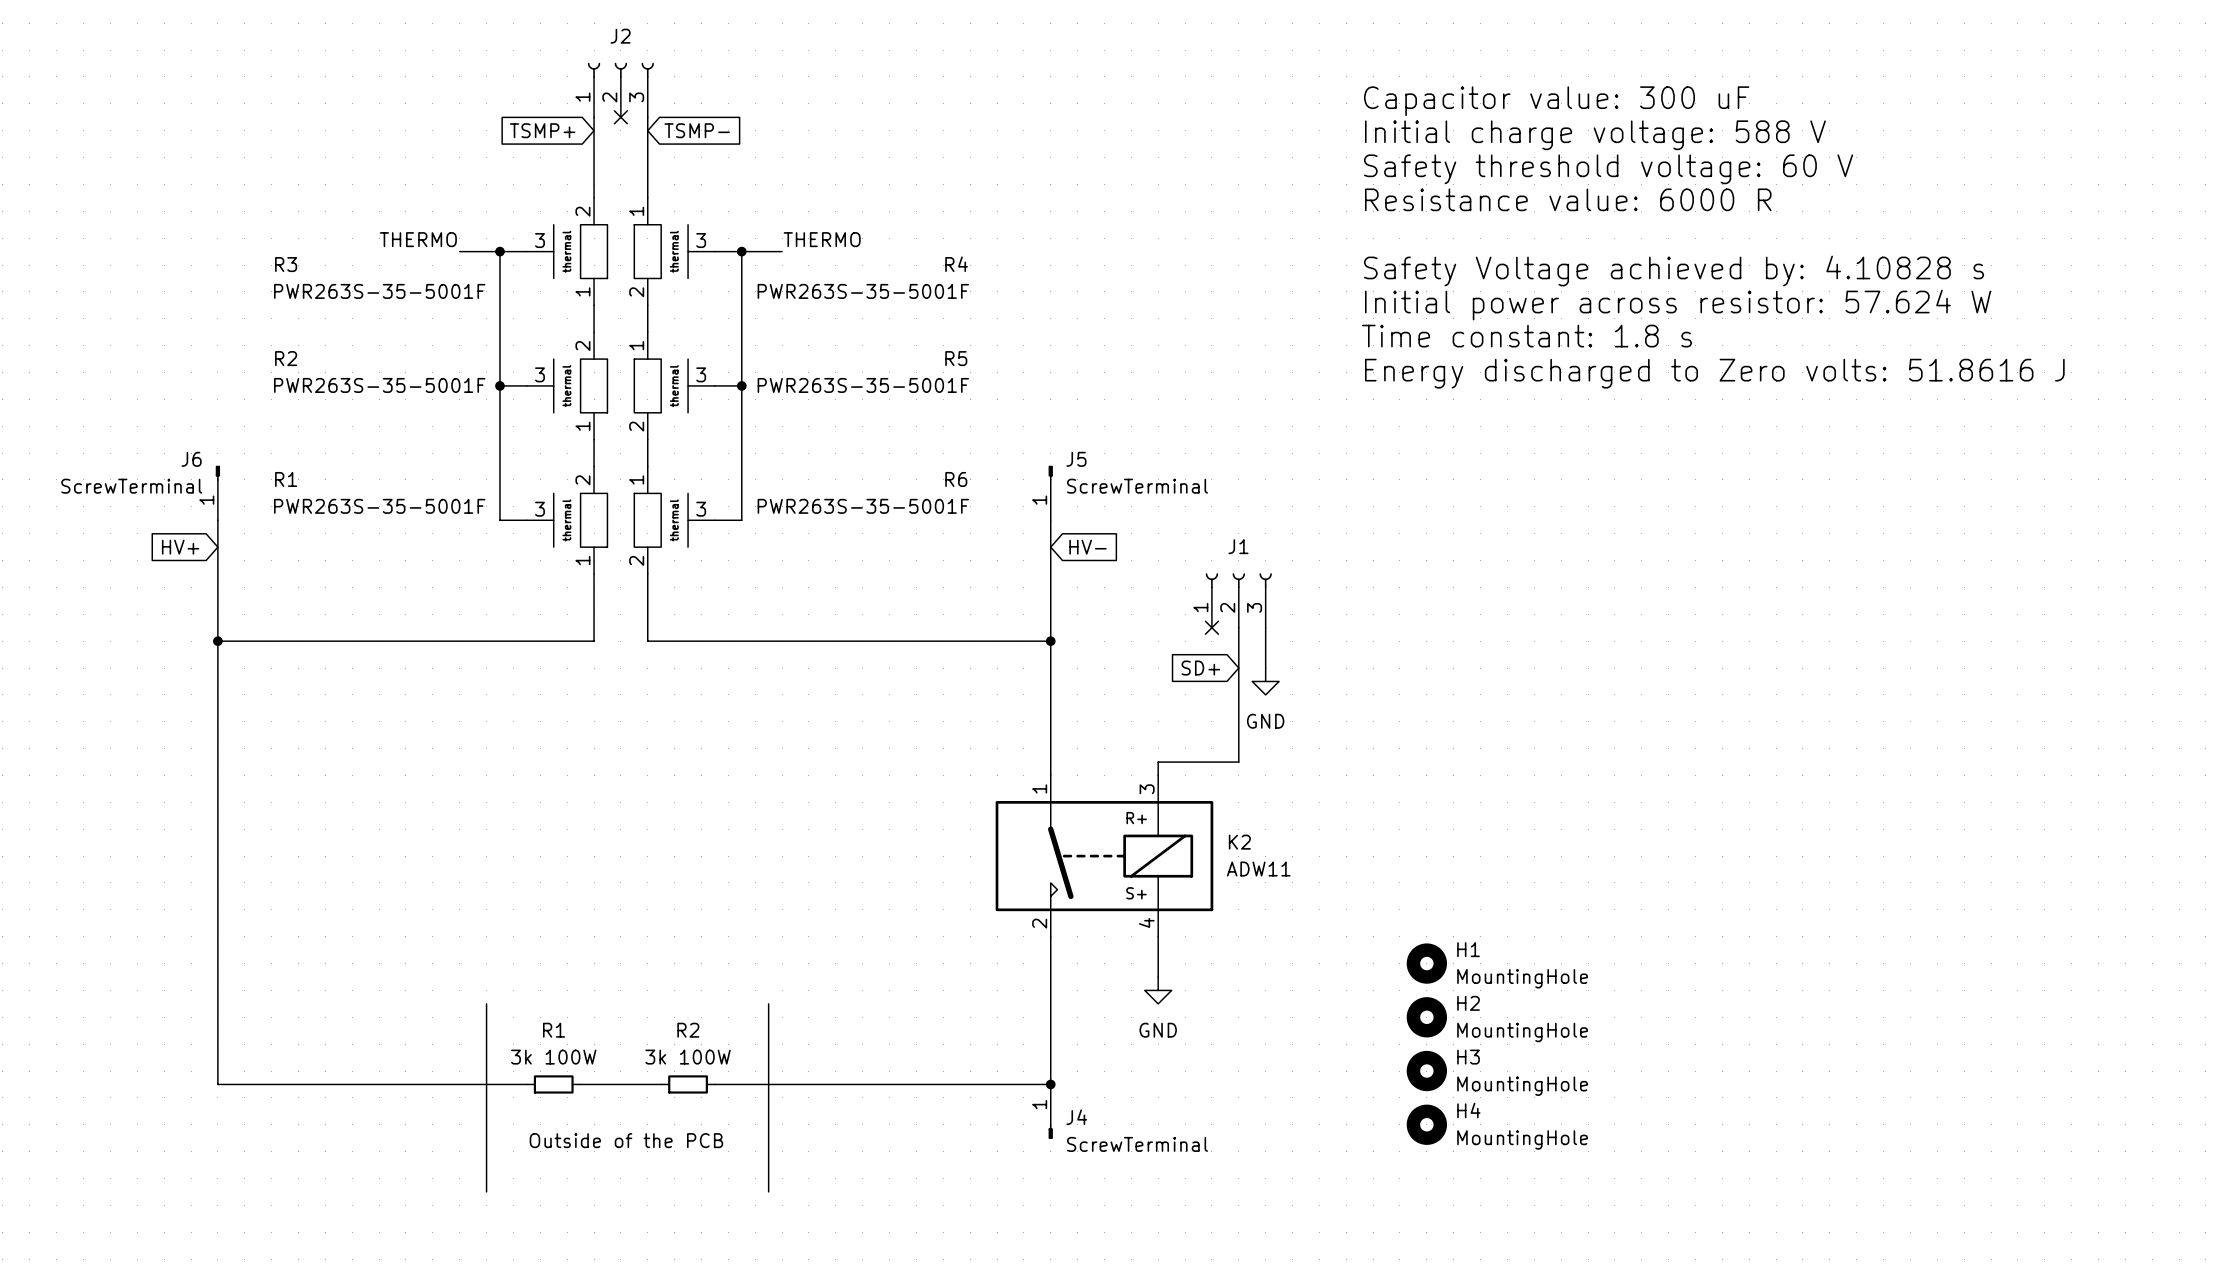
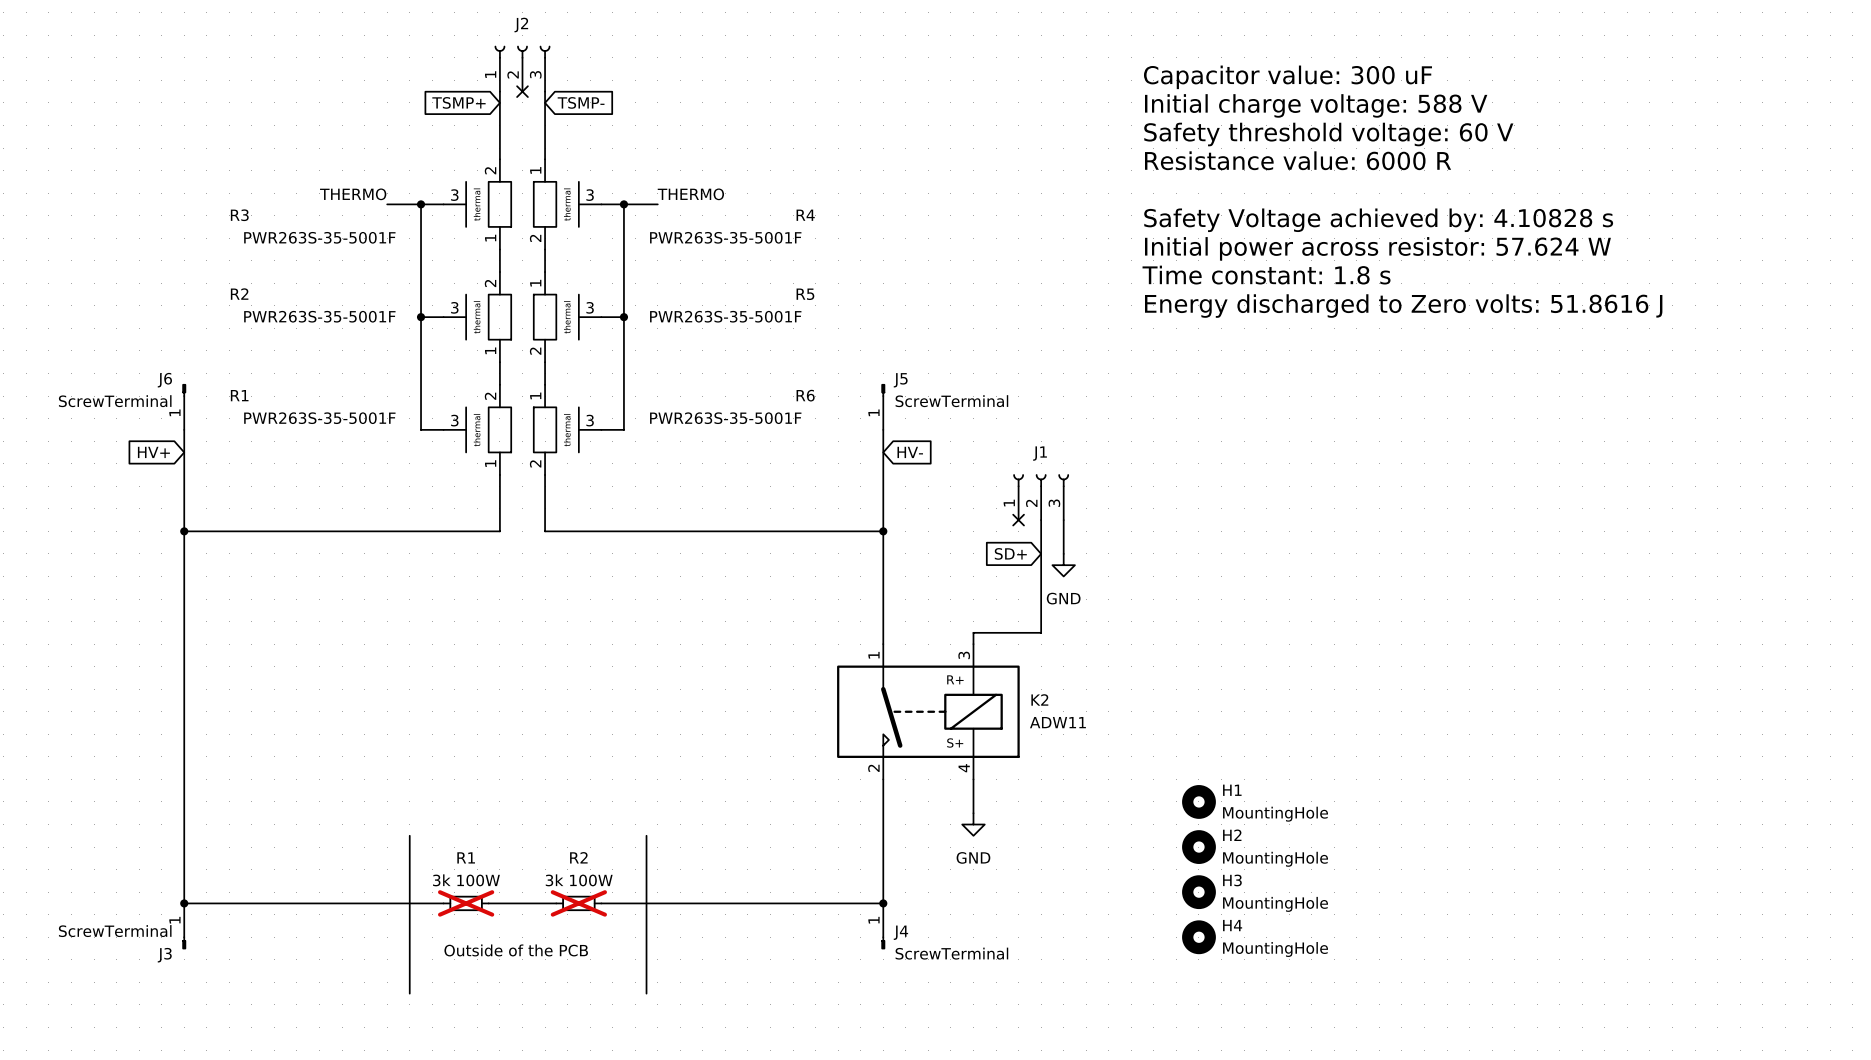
junction: none -> (184, 903)
R1 do-not-place cross: none -> (466, 903)
R2 do-not-place cross: none -> (578, 903)
J3: none -> ScrewTerminal (184, 926)

